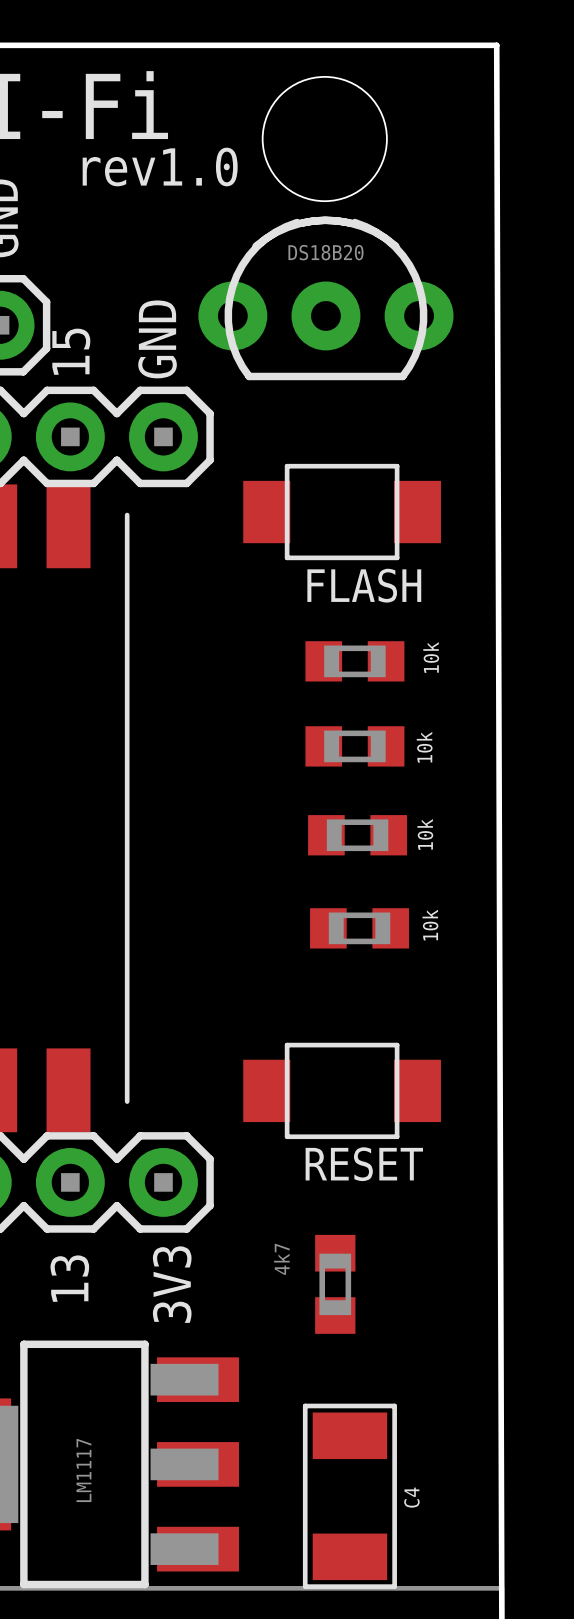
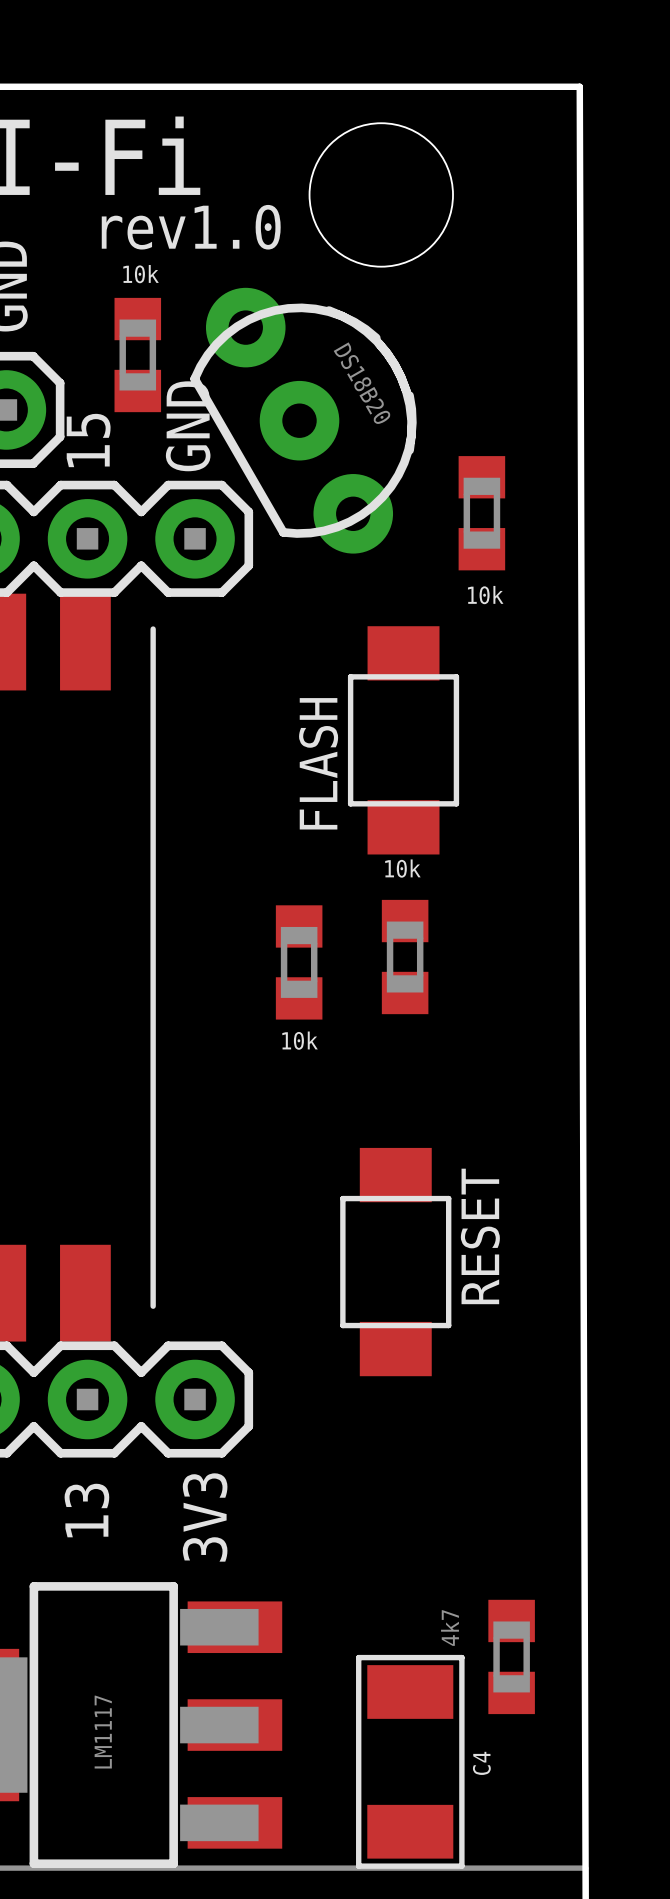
part: none -> 10k (137, 355)
part: DS18B20 (325, 298) -> none
part: none -> DS18B20 (303, 420)
part: none -> 10k (481, 513)
FLASH rotation: 0° (342, 512) -> 90° clockwise (403, 740)
part: 10k (354, 661) -> none
part: 10k (354, 746) -> none
part: none -> 10k (405, 957)
part: none -> 10k (299, 962)
part: 10k (357, 835) -> none
part: 10k (359, 928) -> none
RESET rotation: 0° (342, 1090) -> 90° clockwise (395, 1262)
RESET name position: RESET (364, 1164) -> RESET (480, 1236)
part position: (335, 1284) -> (511, 1656)

